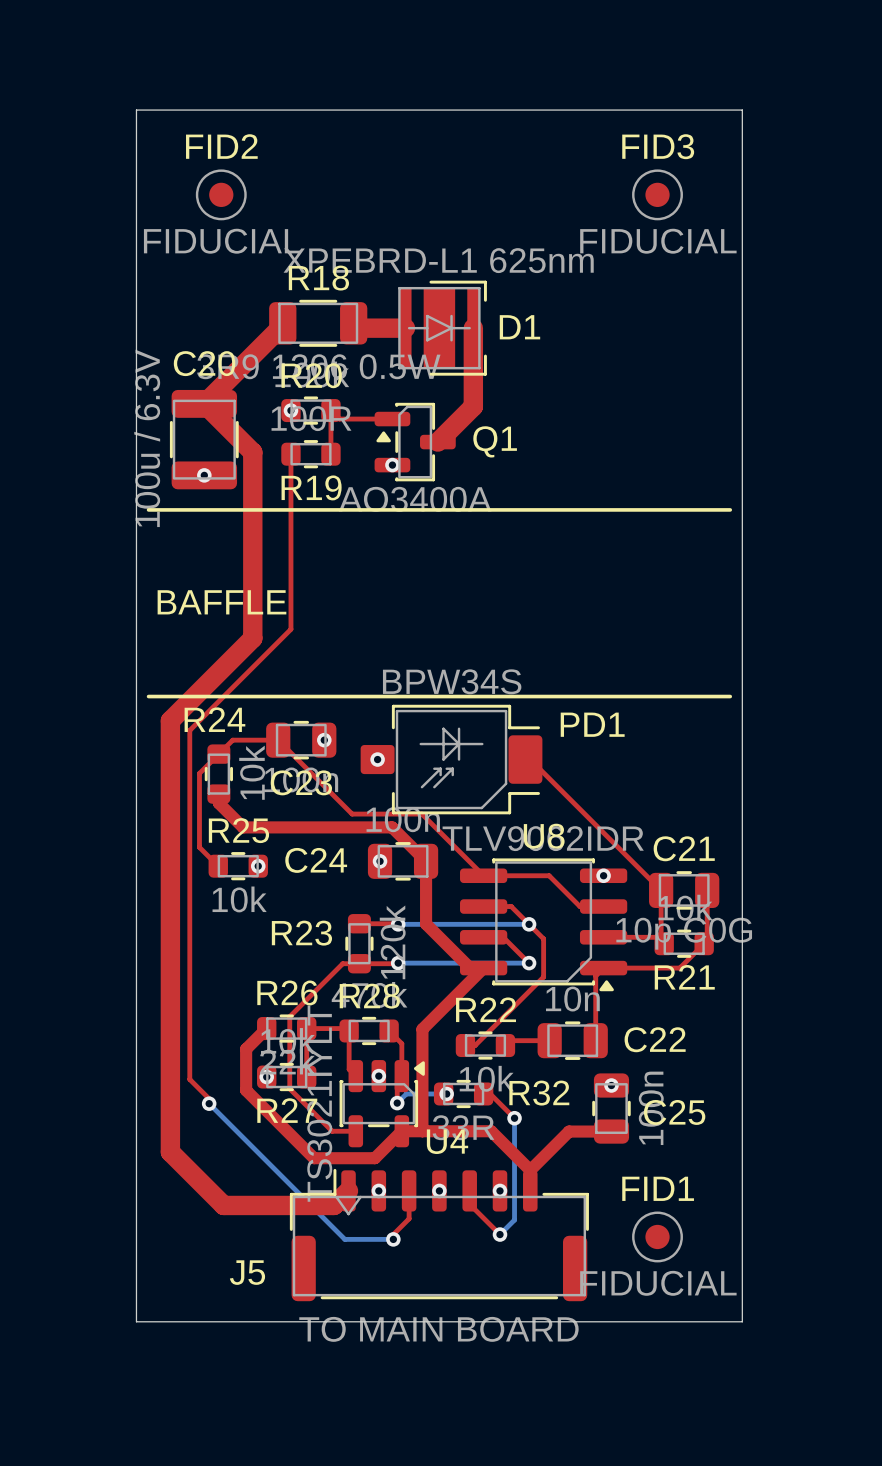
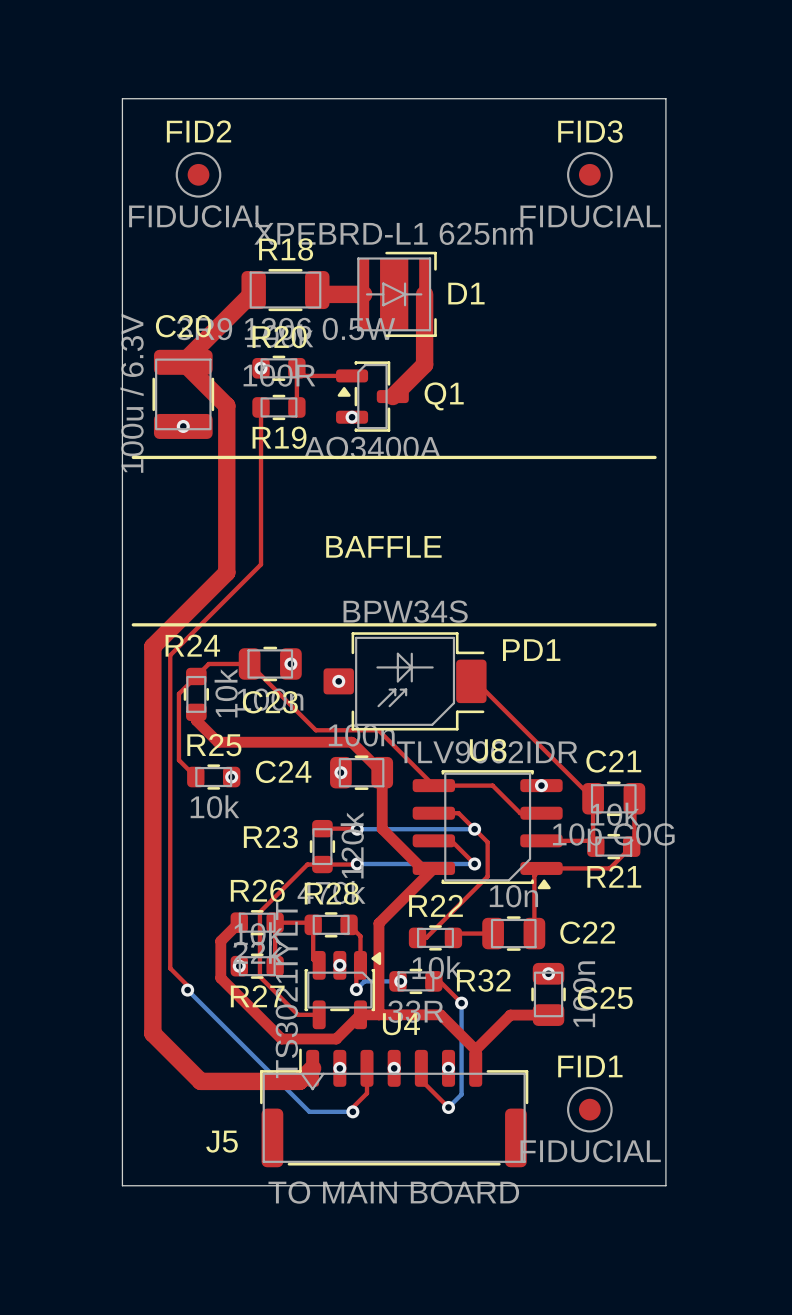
text position: BAFFLE (221, 602) -> BAFFLE (383, 546)

